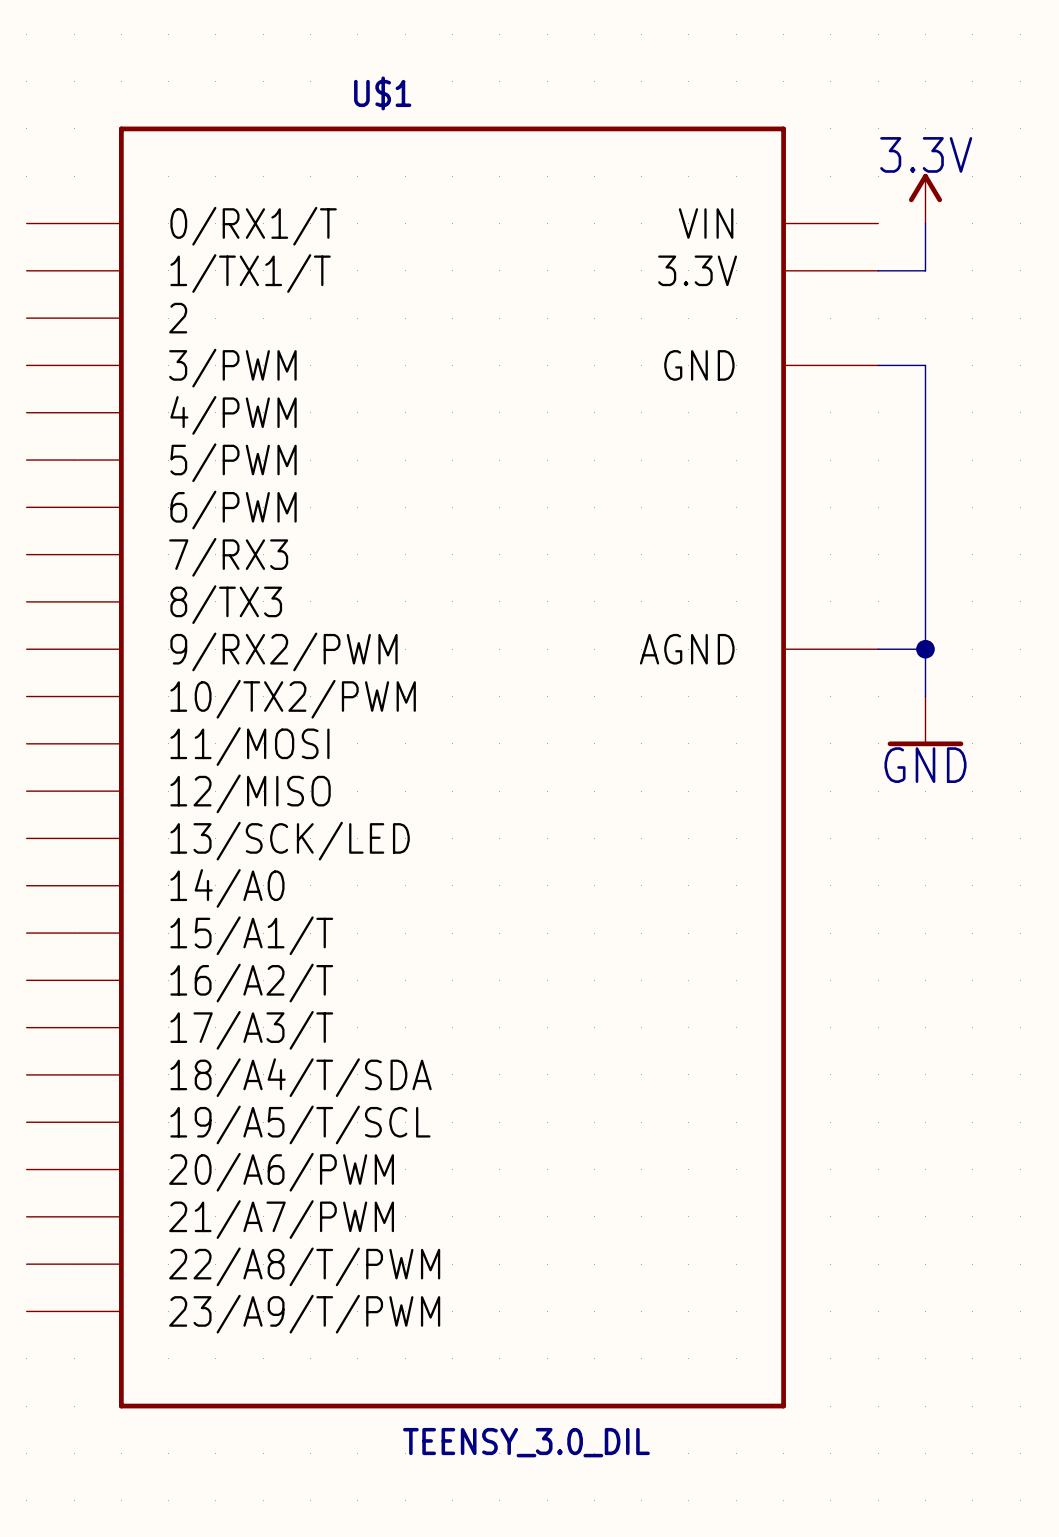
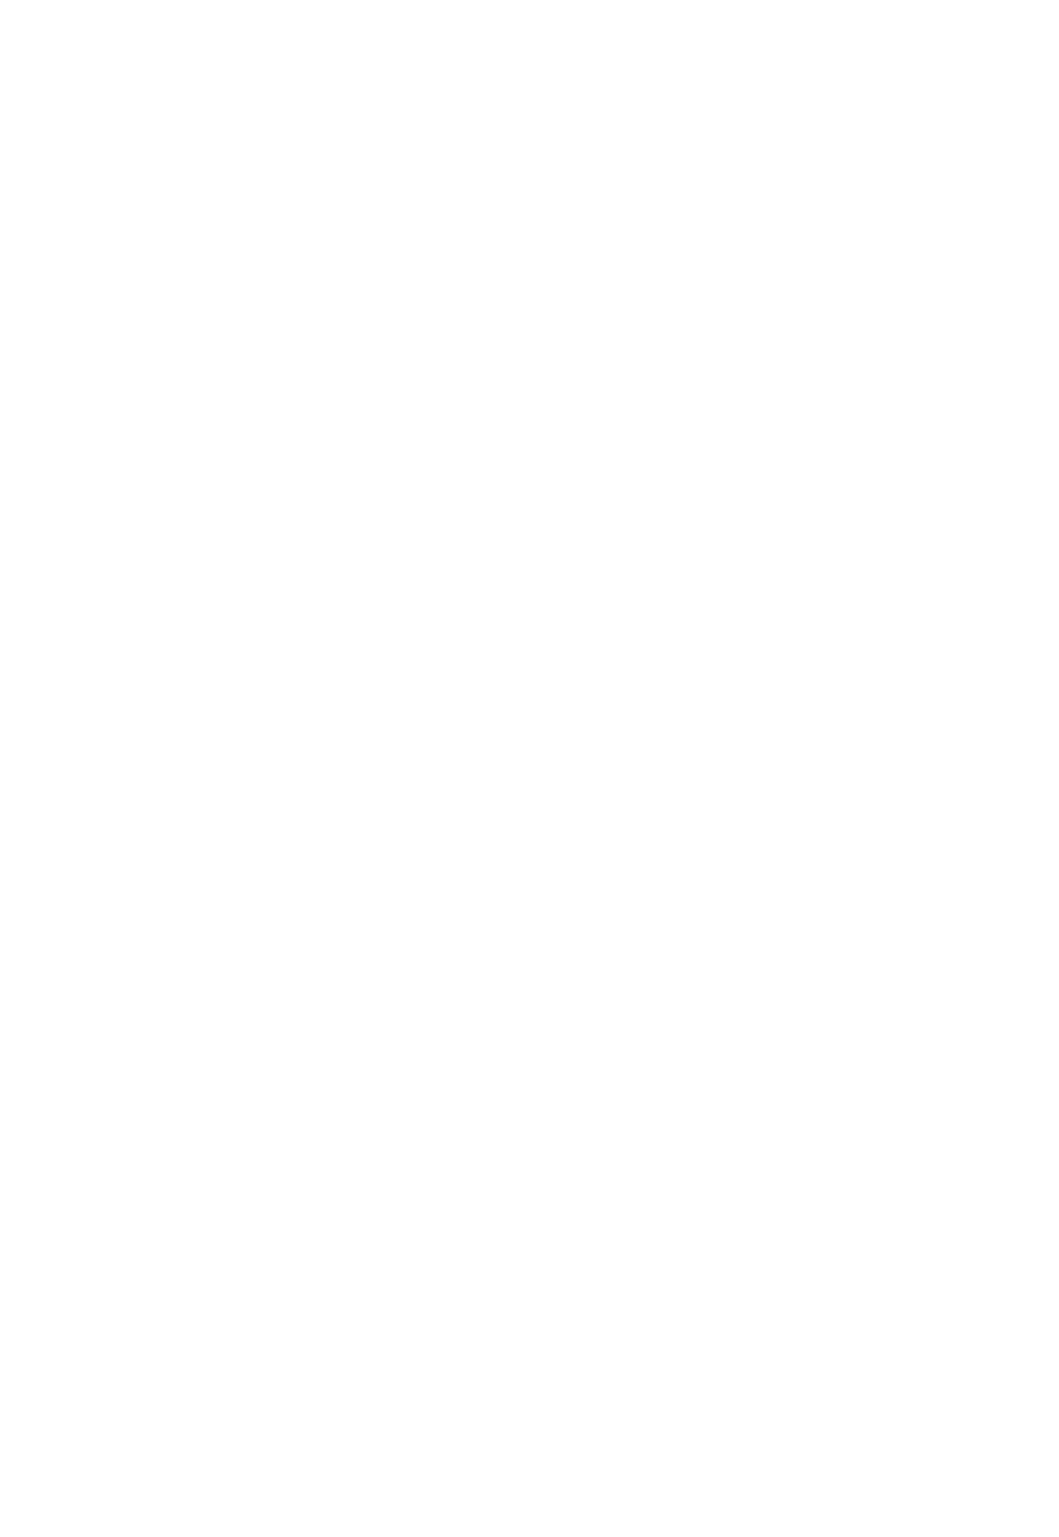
power symbol: 3.3V (925, 198) -> none
wire: (925, 223) (925, 270) (878, 270) -> none
wire: (878, 365) (925, 365) (925, 696) -> none
wire: (878, 649) (925, 649) -> none
junction: (925, 649) -> none
power symbol: GND (925, 721) -> none
U$1: TEENSY_3.0_DIL (452, 767) -> none

